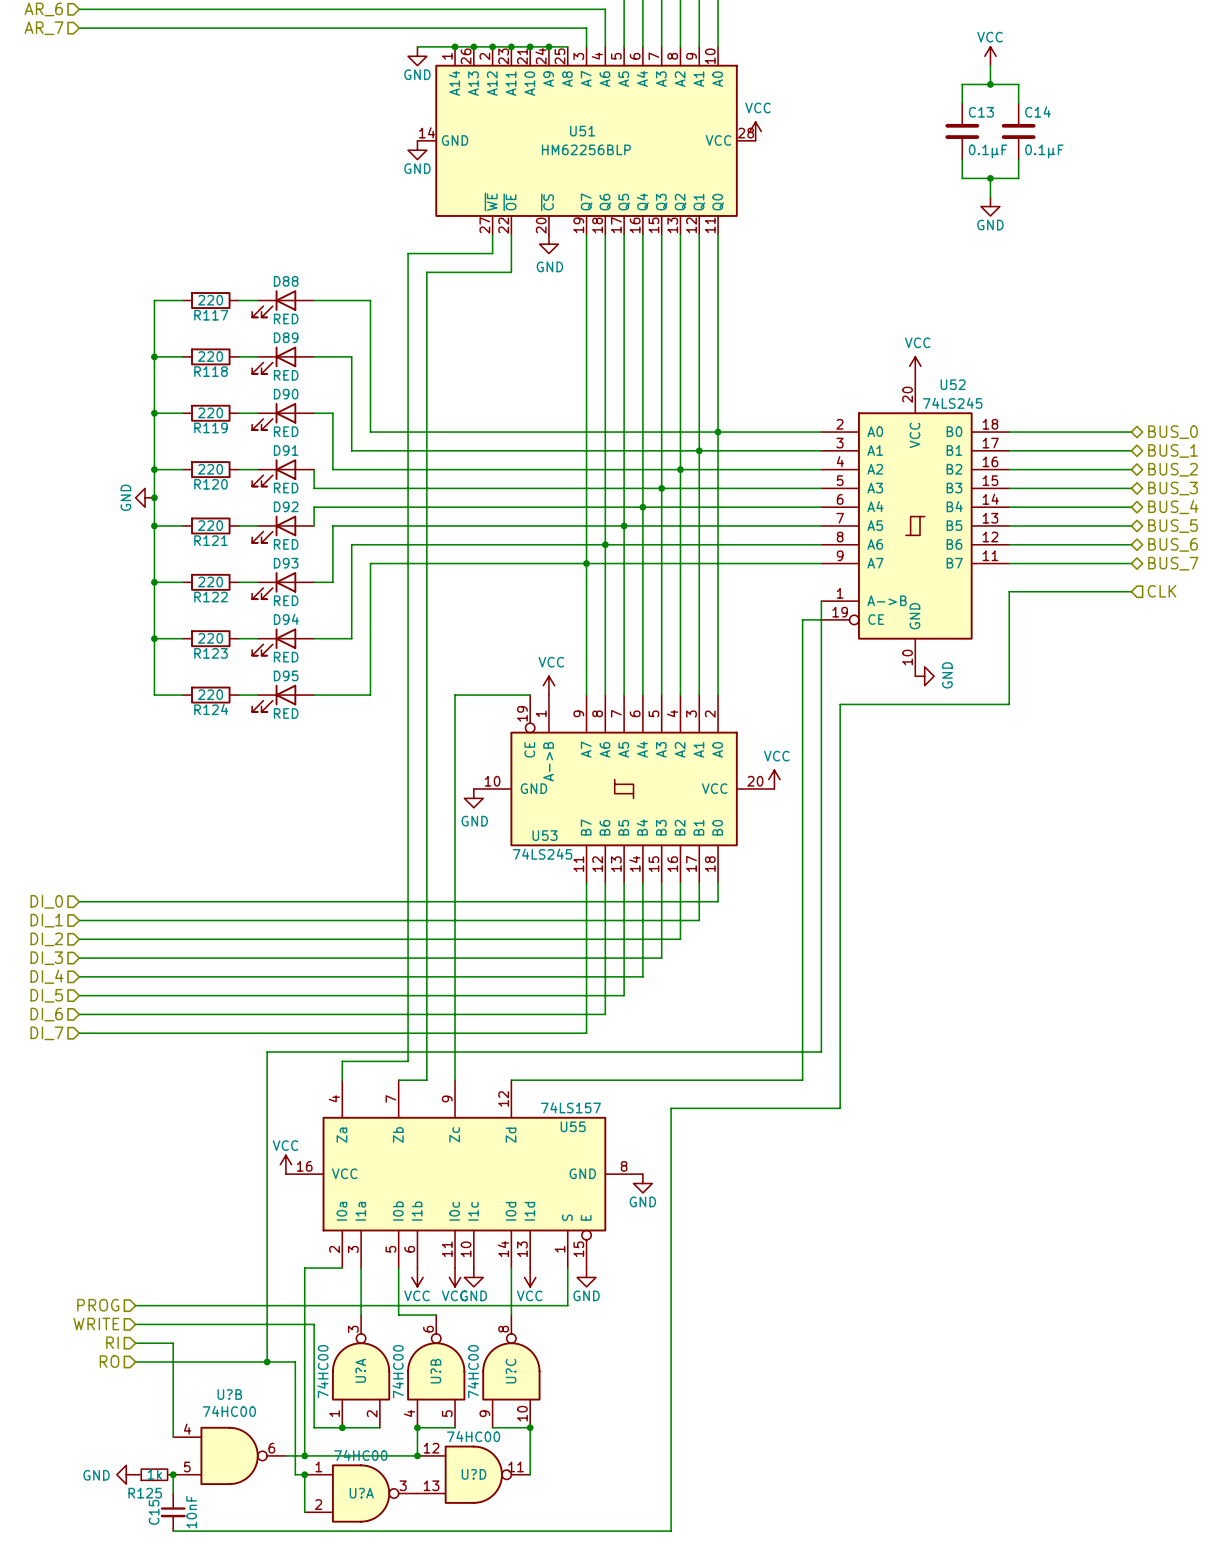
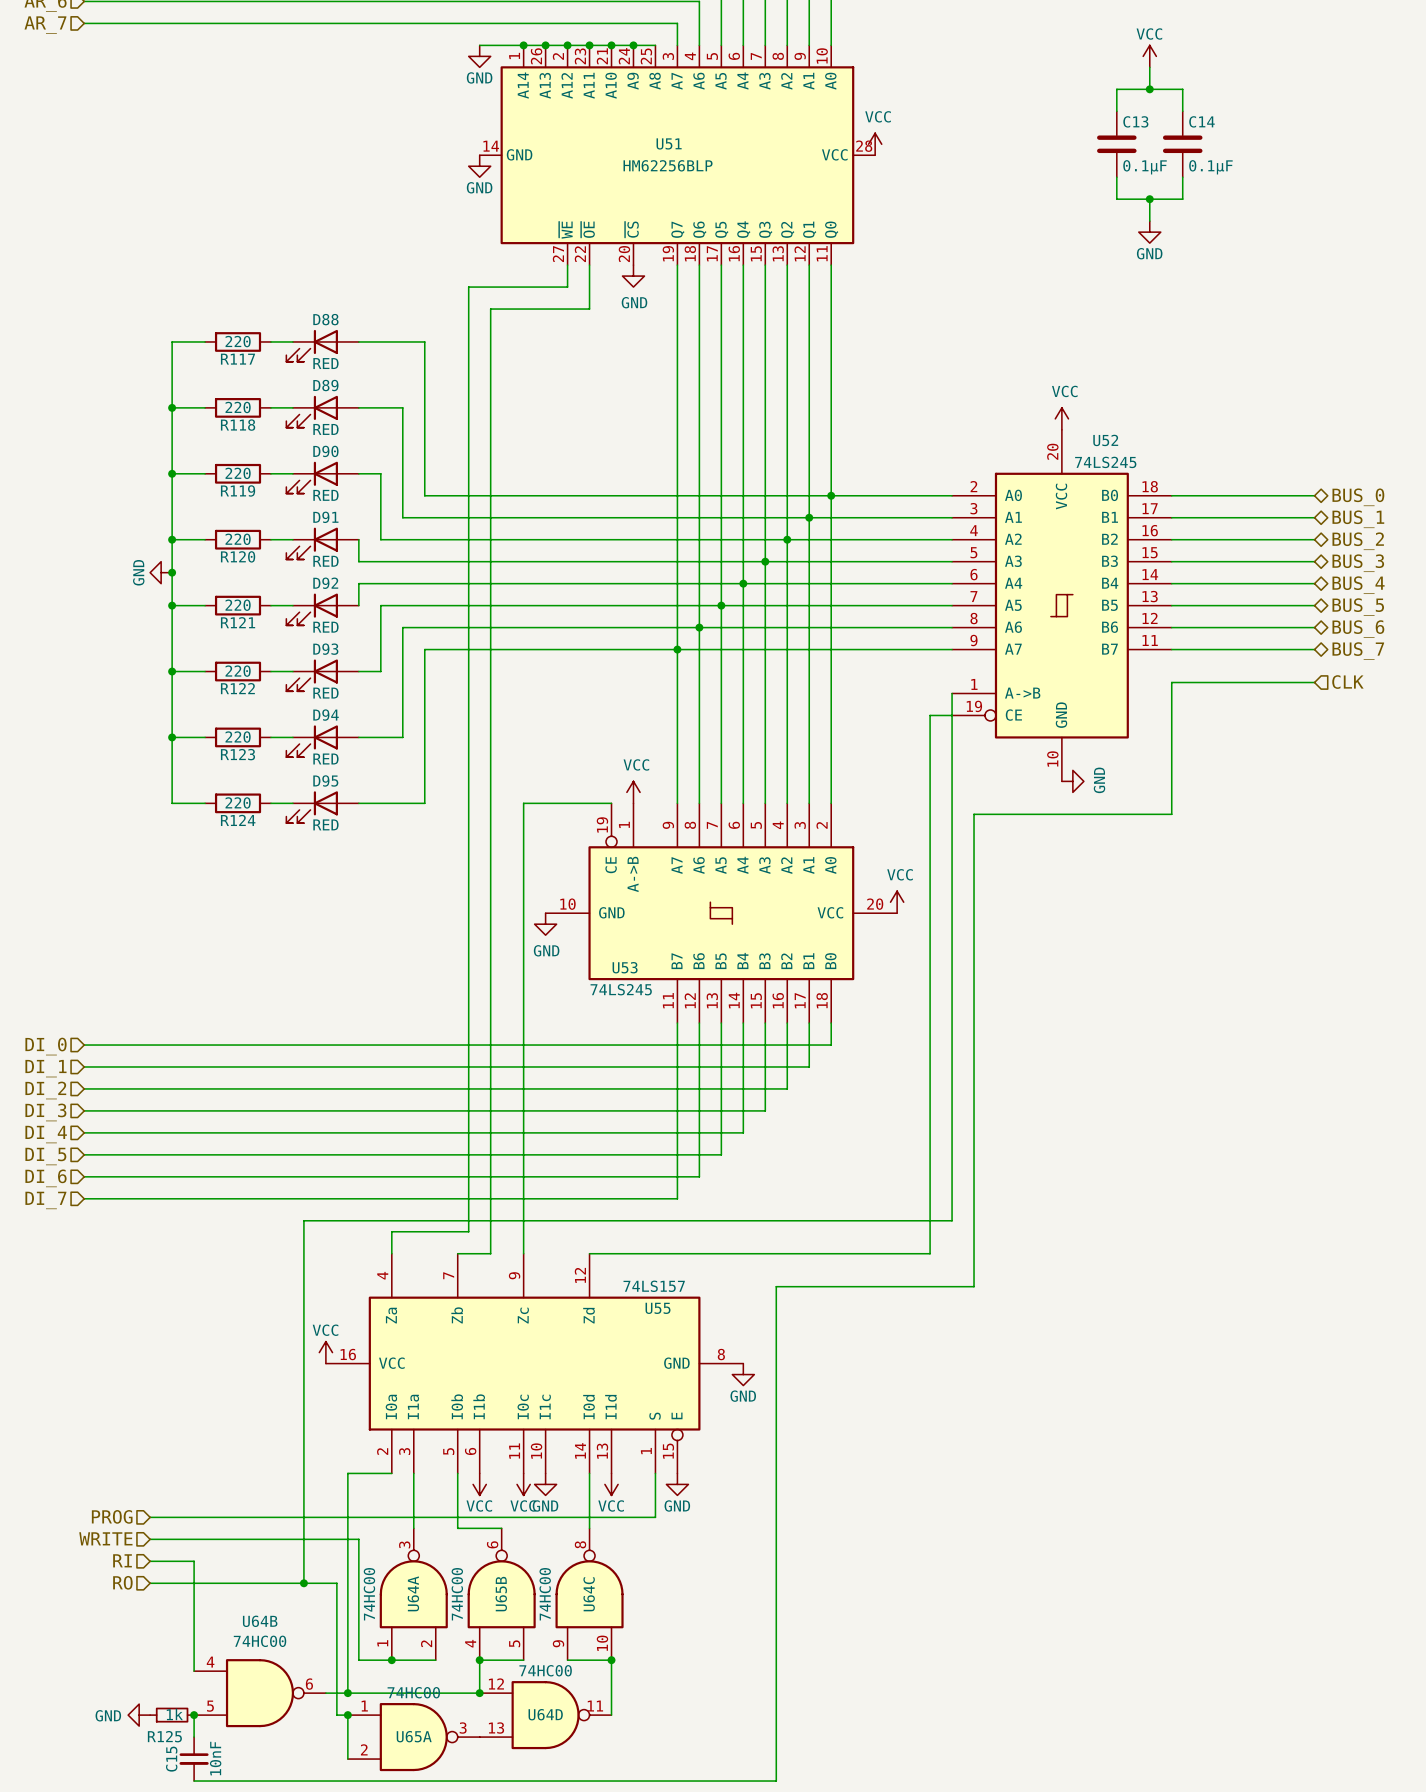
U?A name: U?A (360, 1370) -> U64A (413, 1593)
U?B name: U?B (435, 1371) -> U65B (501, 1594)
U?C name: U?C (511, 1371) -> U64C (589, 1594)
U?B name: U?B (229, 1394) -> U64B (260, 1621)
U?D name: U?D (474, 1474) -> U64D (545, 1714)
U?A name: U?A (361, 1493) -> U65A (414, 1736)

